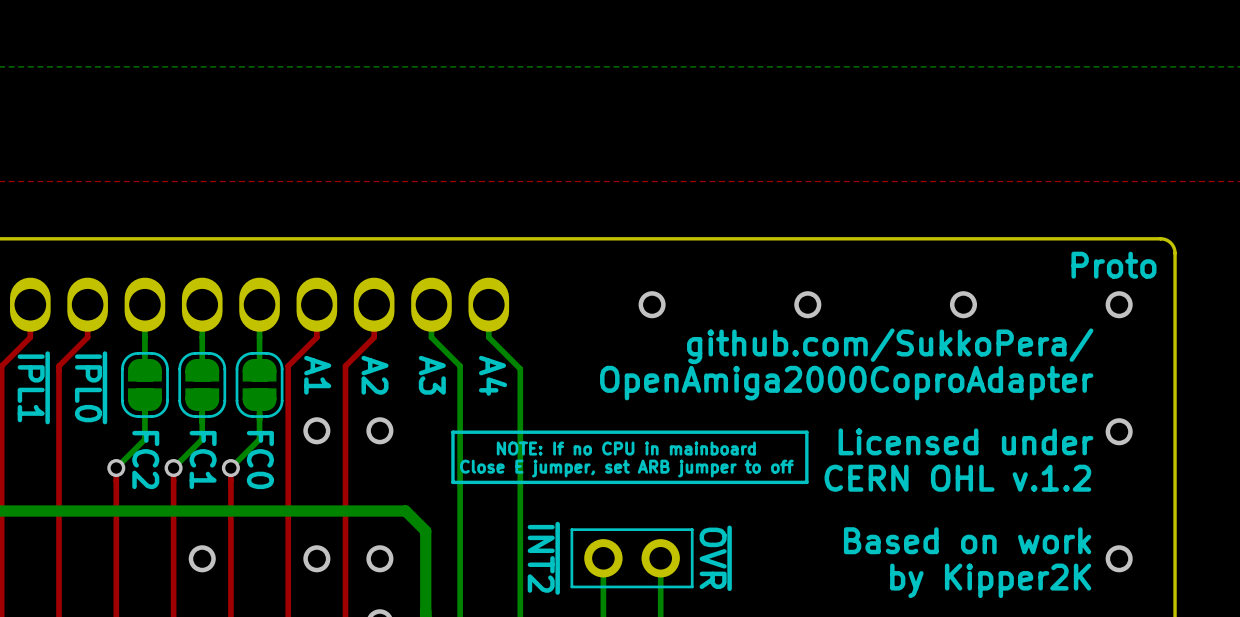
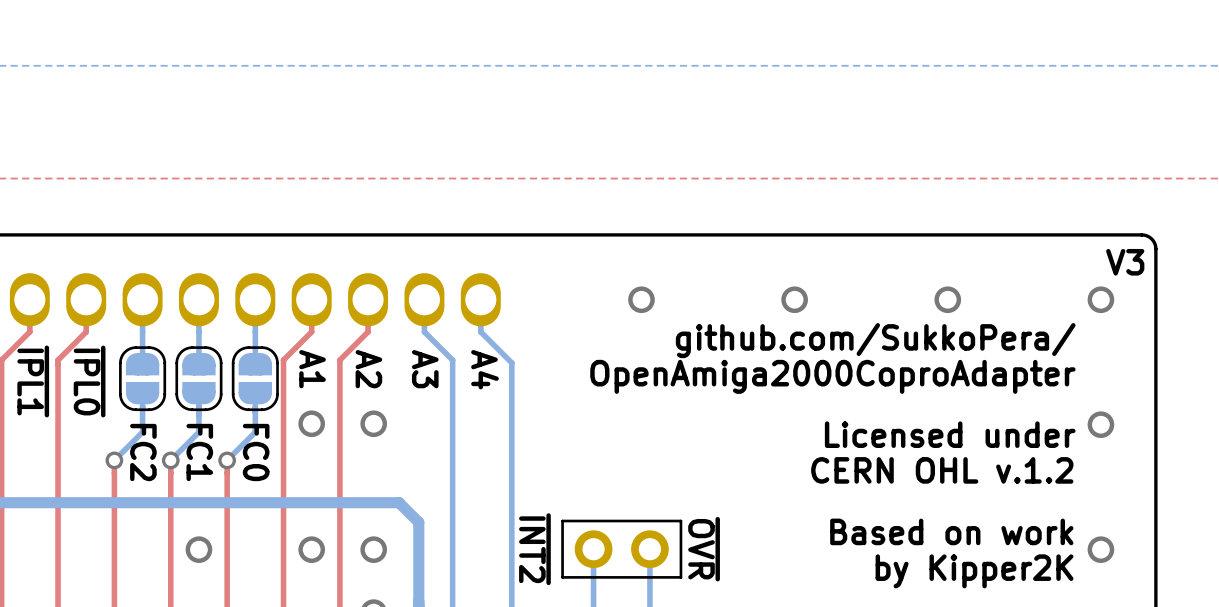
text: Proto (1113, 265) -> none
text: none -> V3 (1125, 262)
line: (806, 432) (806, 482) (452, 482) (452, 432) (806, 432) -> none
text: NOTE: If no CPU in mainboard (626, 448) -> none
text: Close E jumper, set ARB jumper to off (626, 468) -> none

